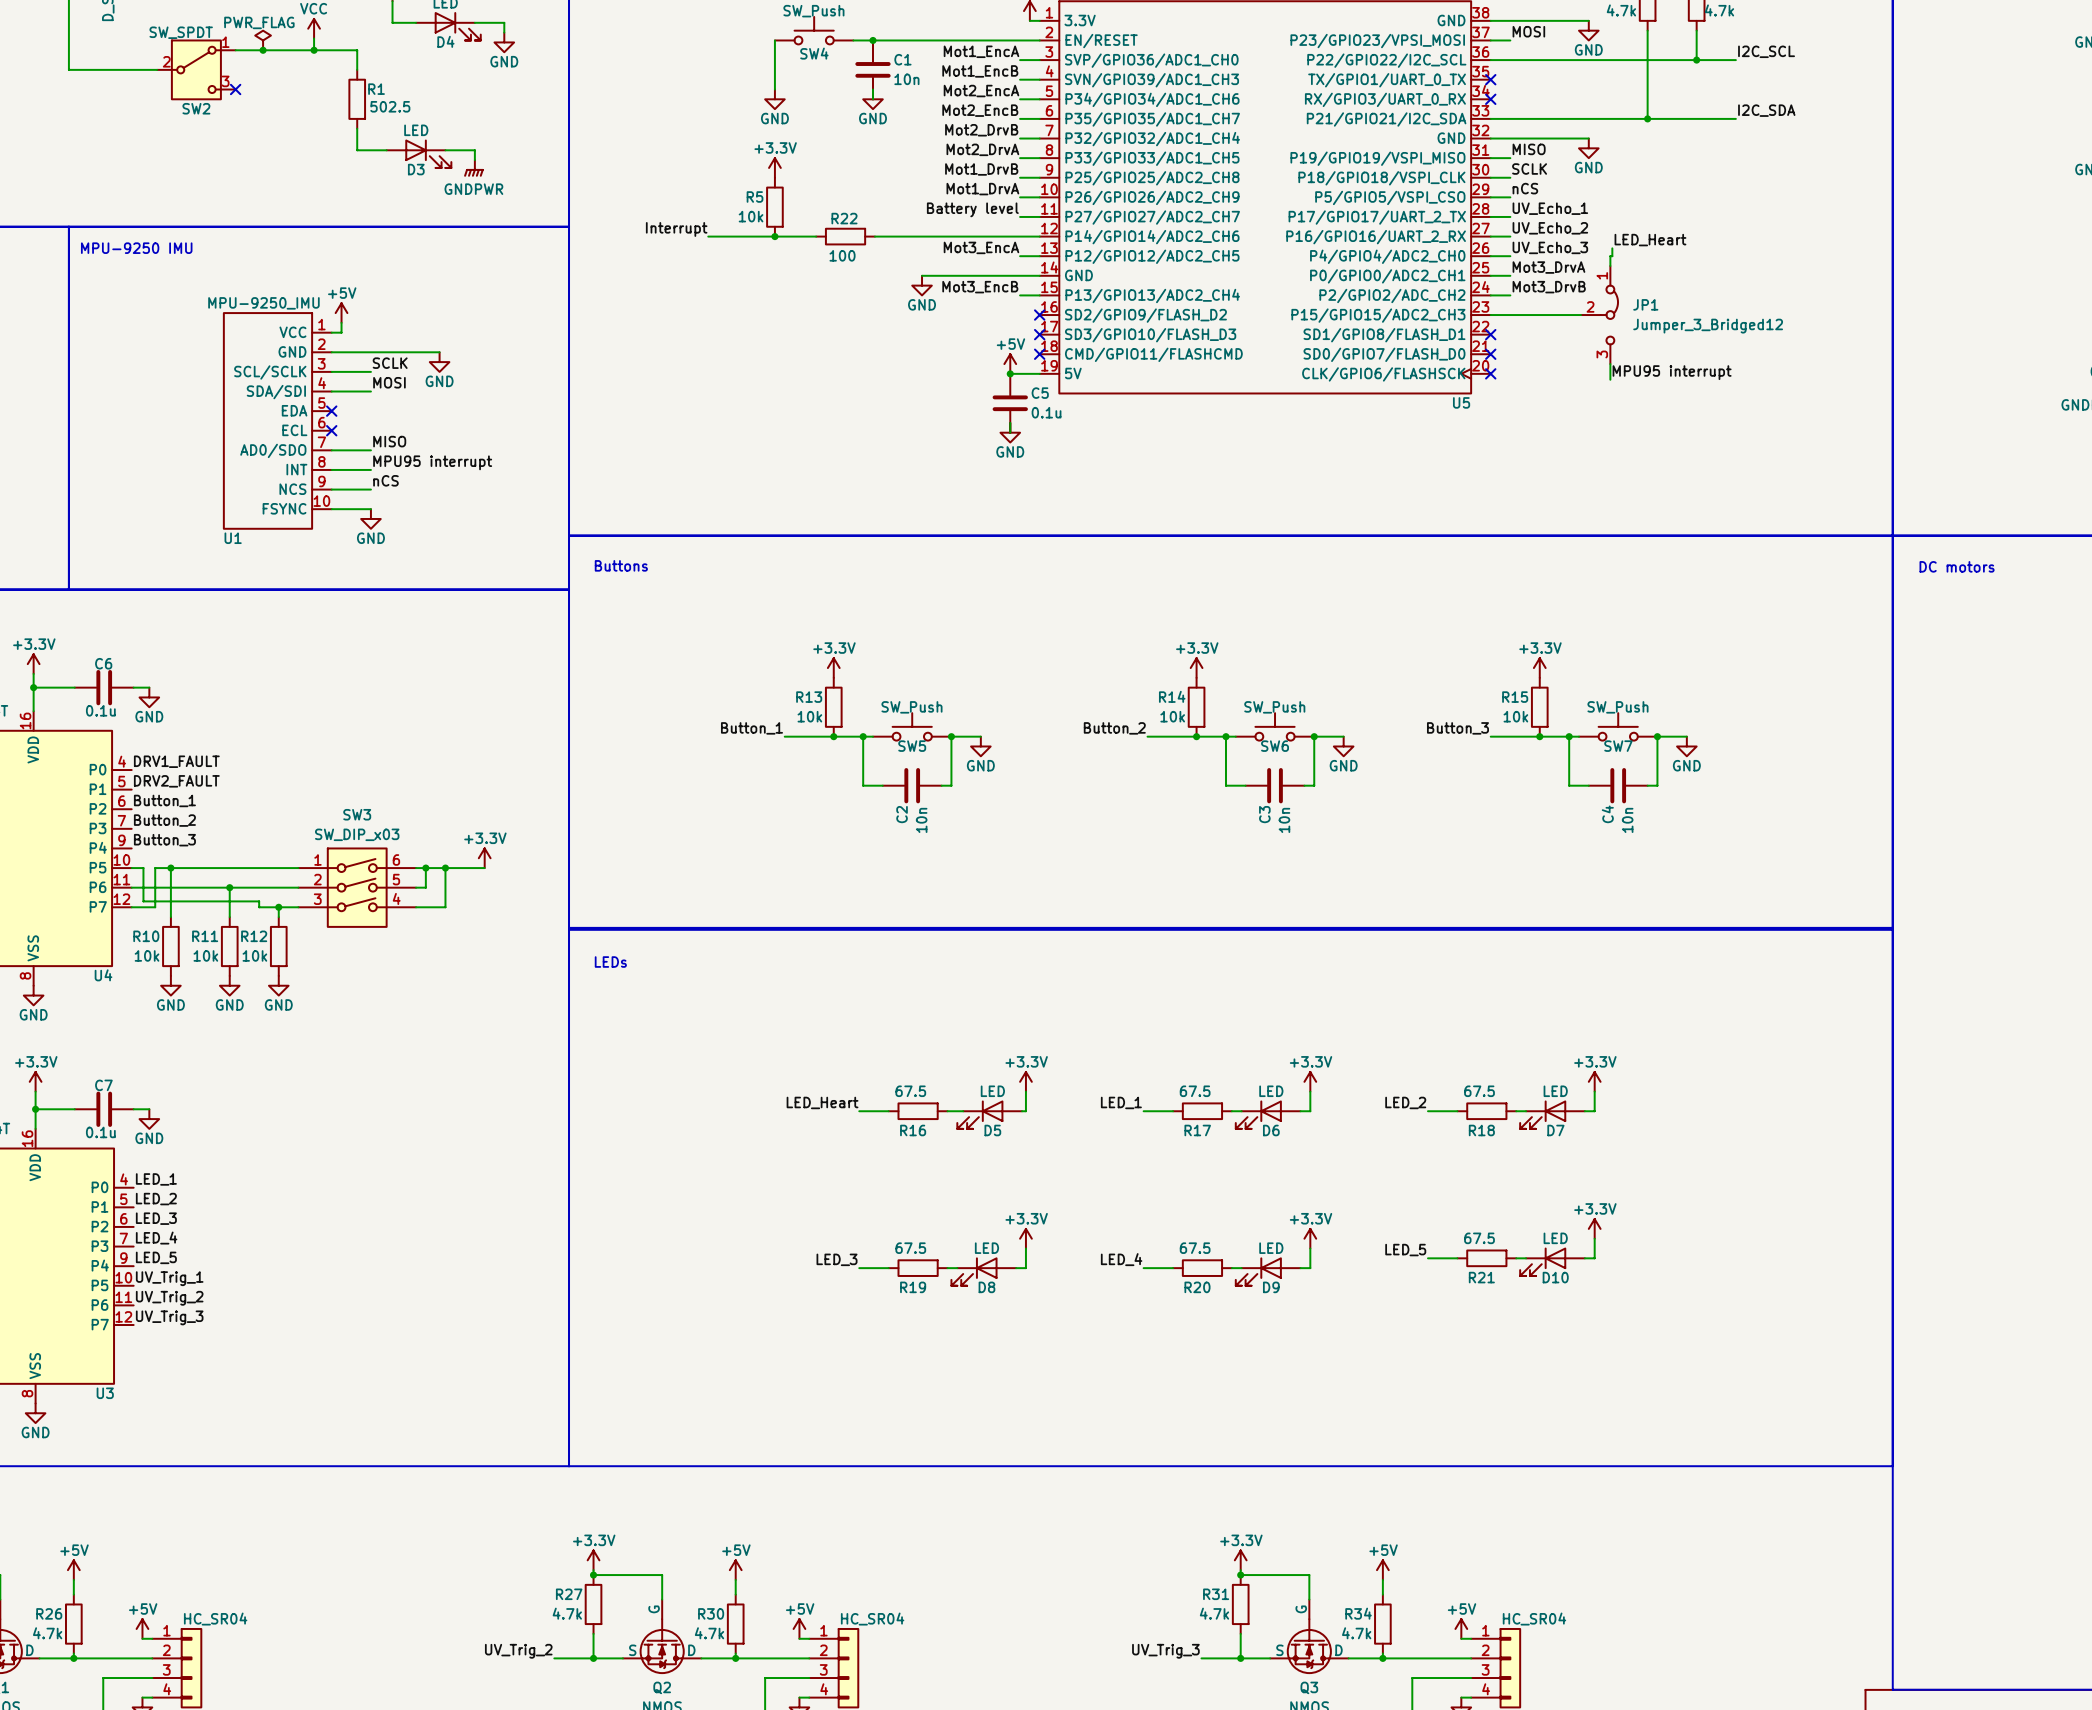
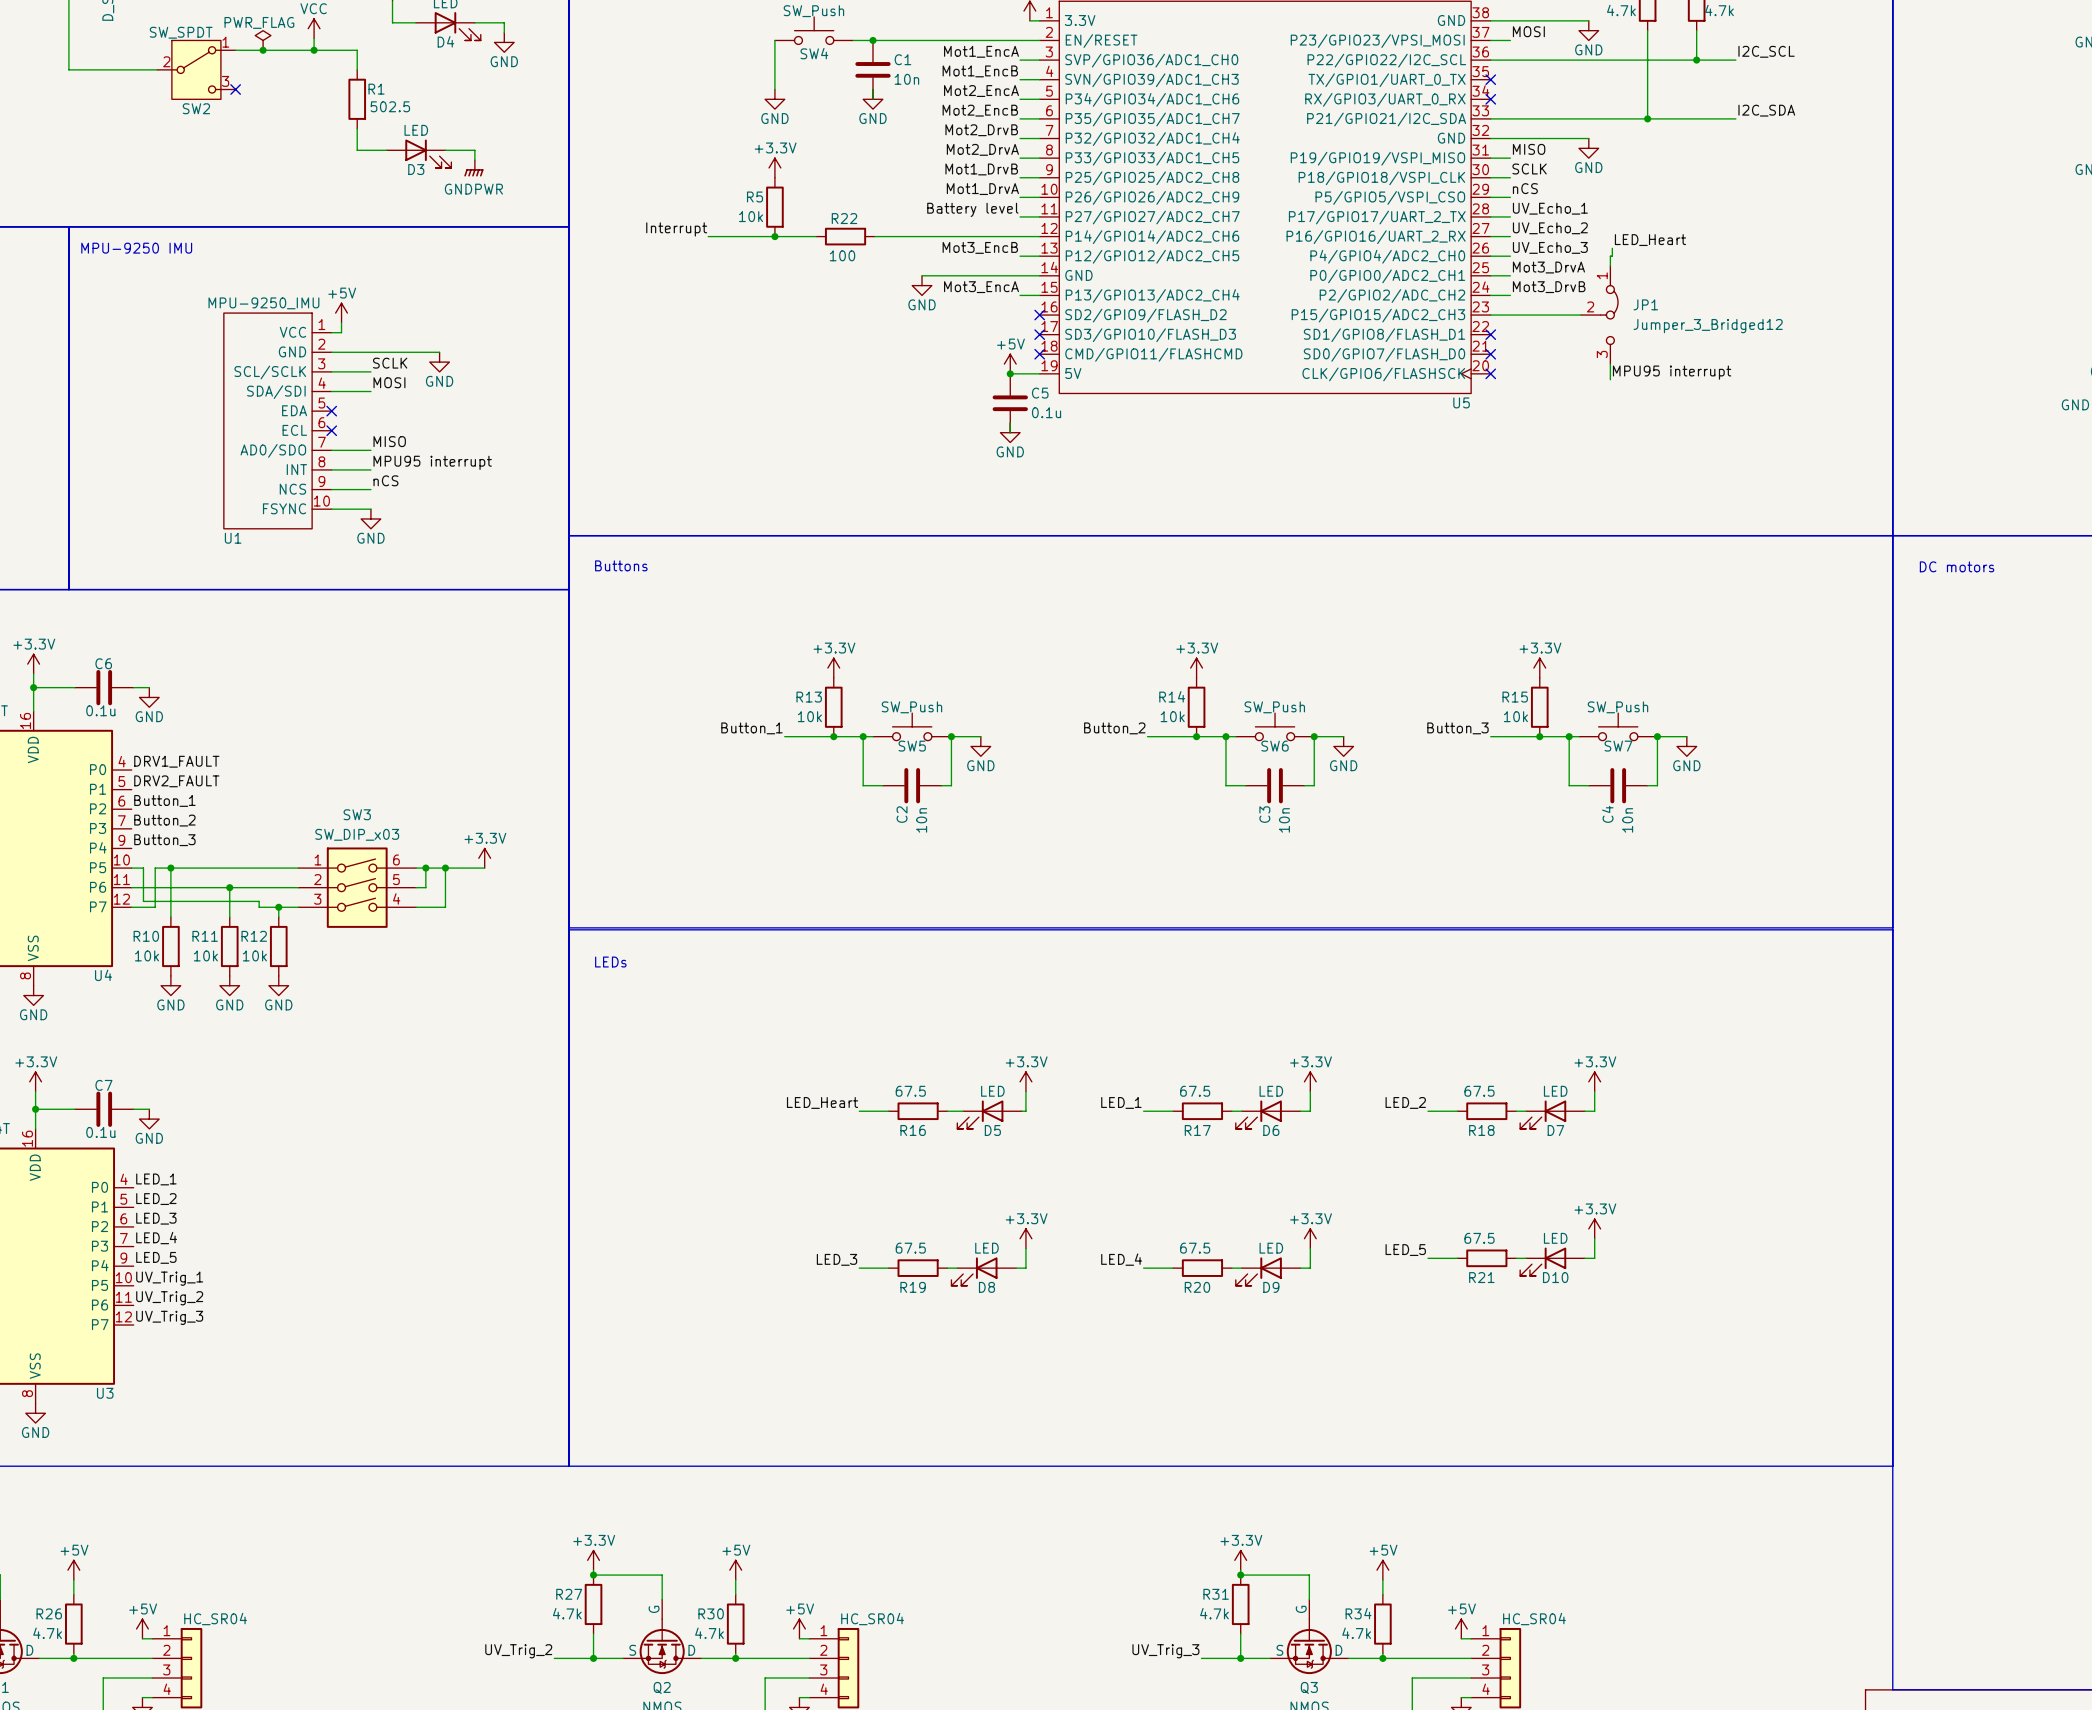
label: Mot3_EncA (981, 247) -> Mot3_EncB (980, 247)
label: Mot3_EncB (980, 287) -> Mot3_EncA (981, 287)

